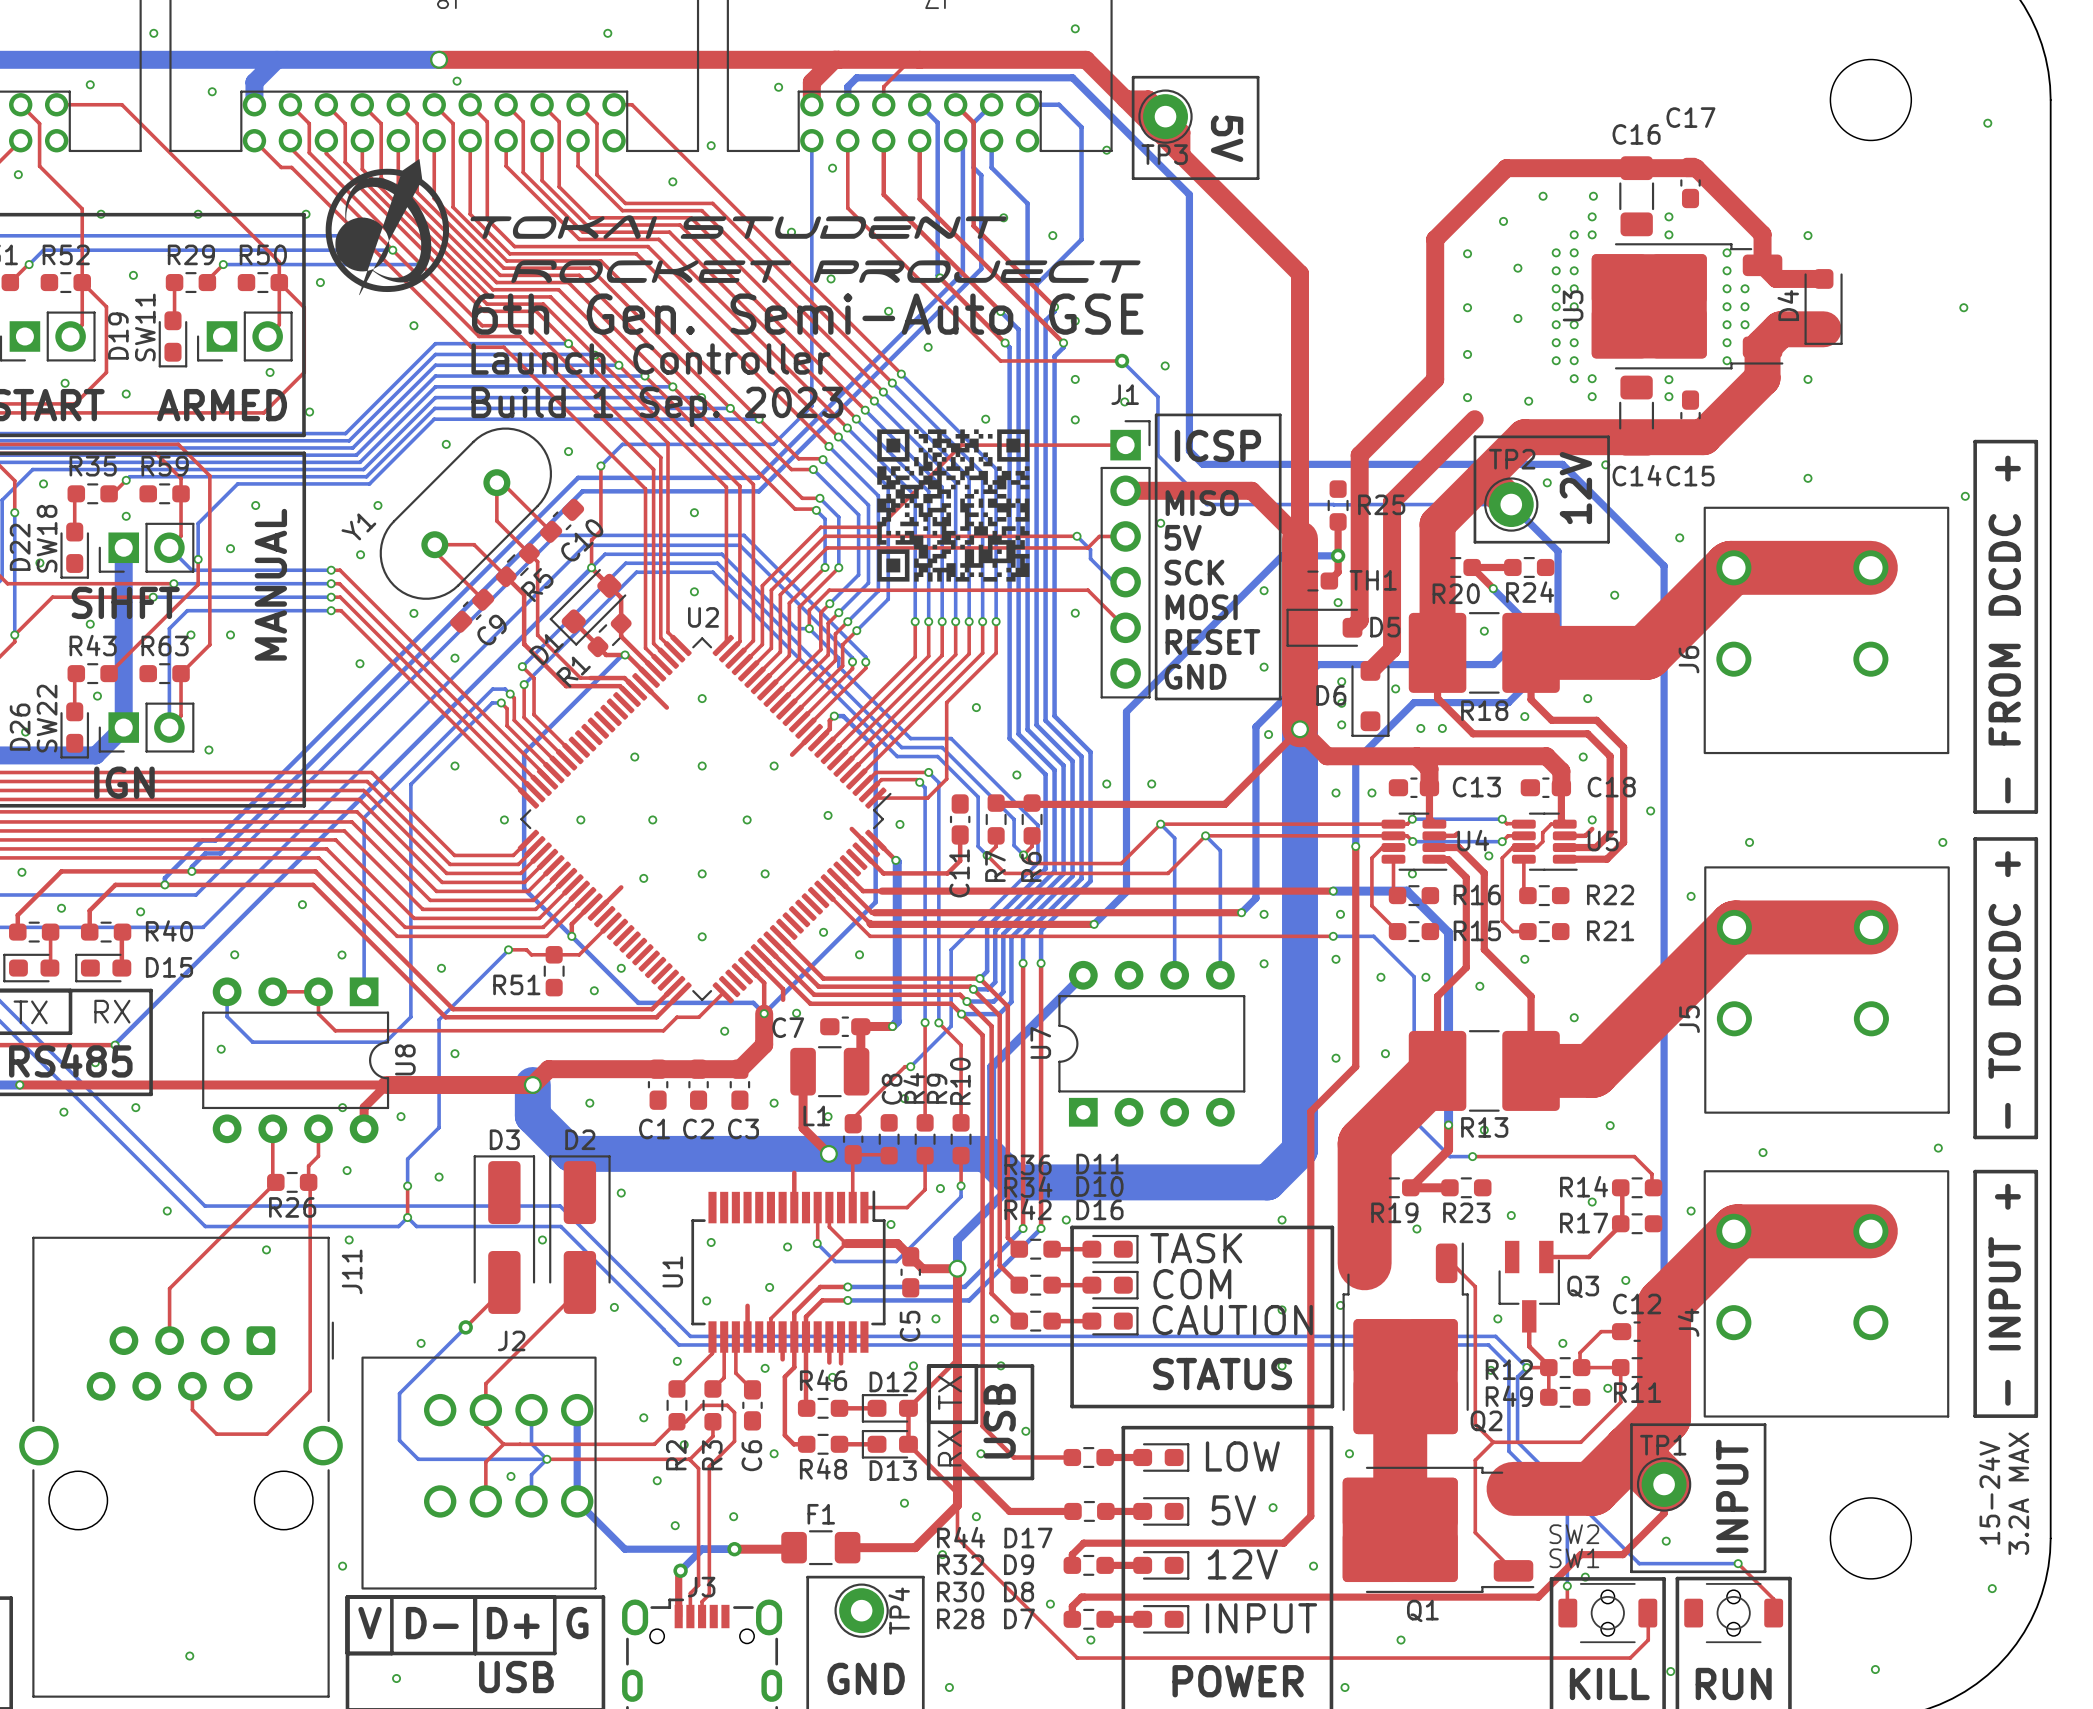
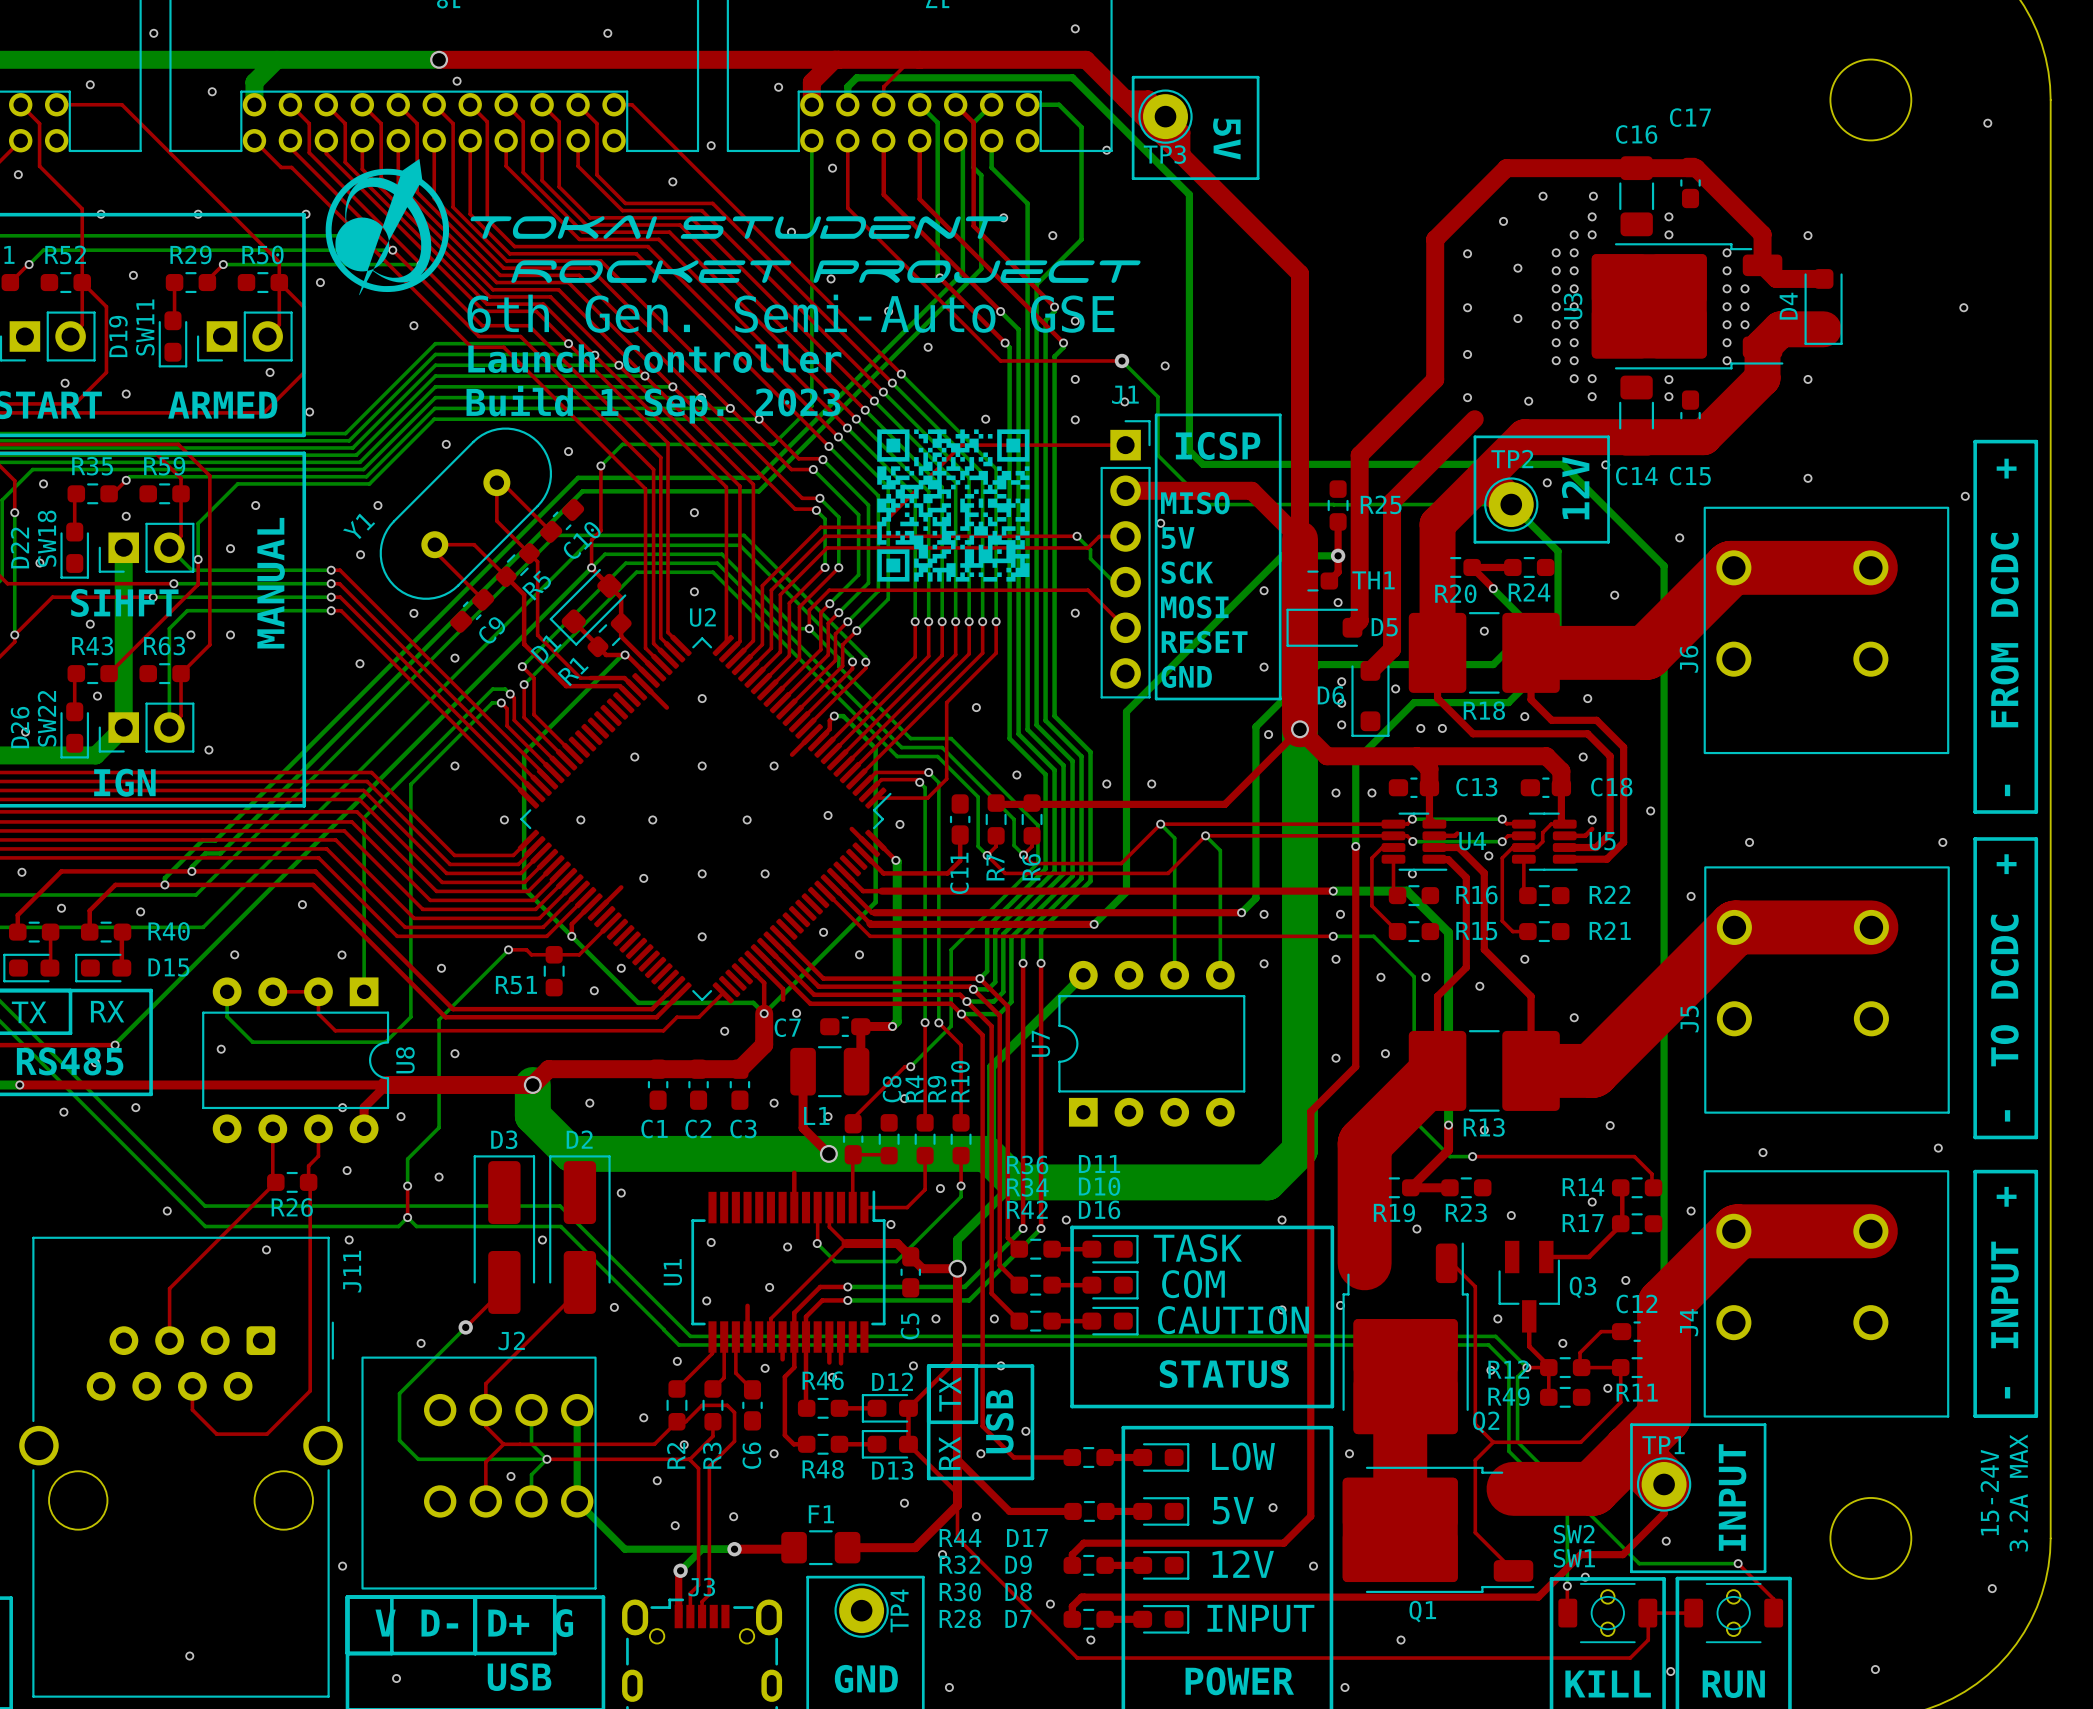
top track: none -> (1647, 1613) (1693, 1613)

